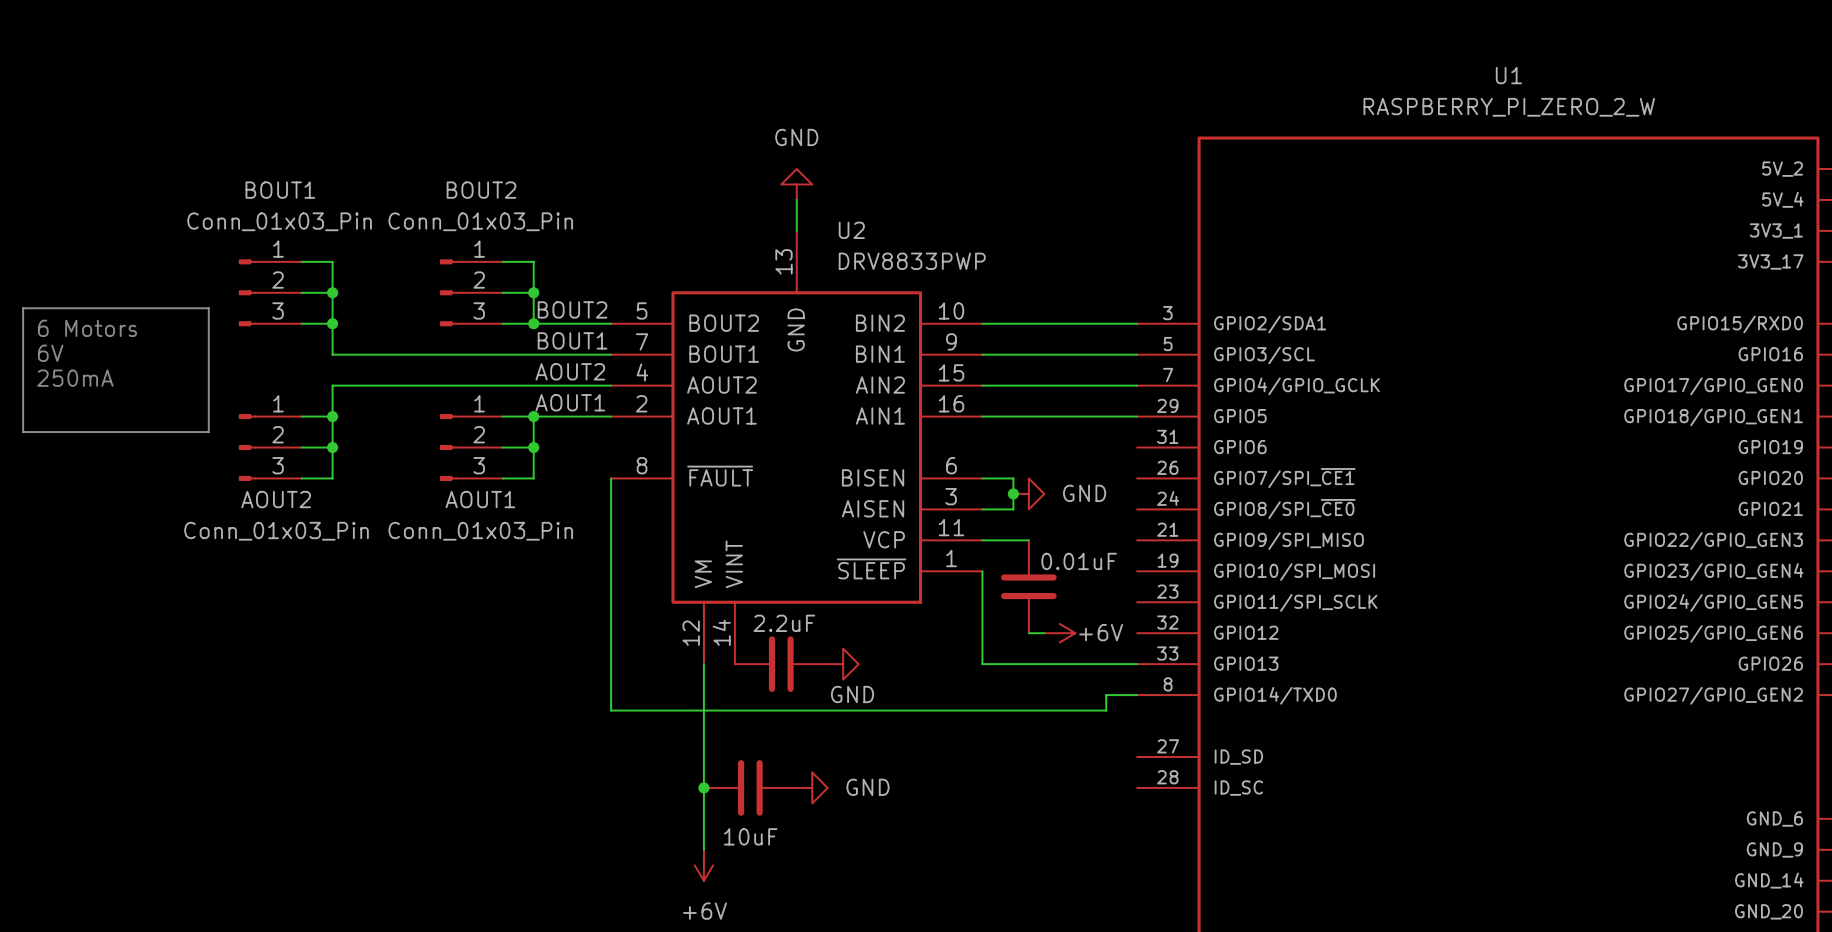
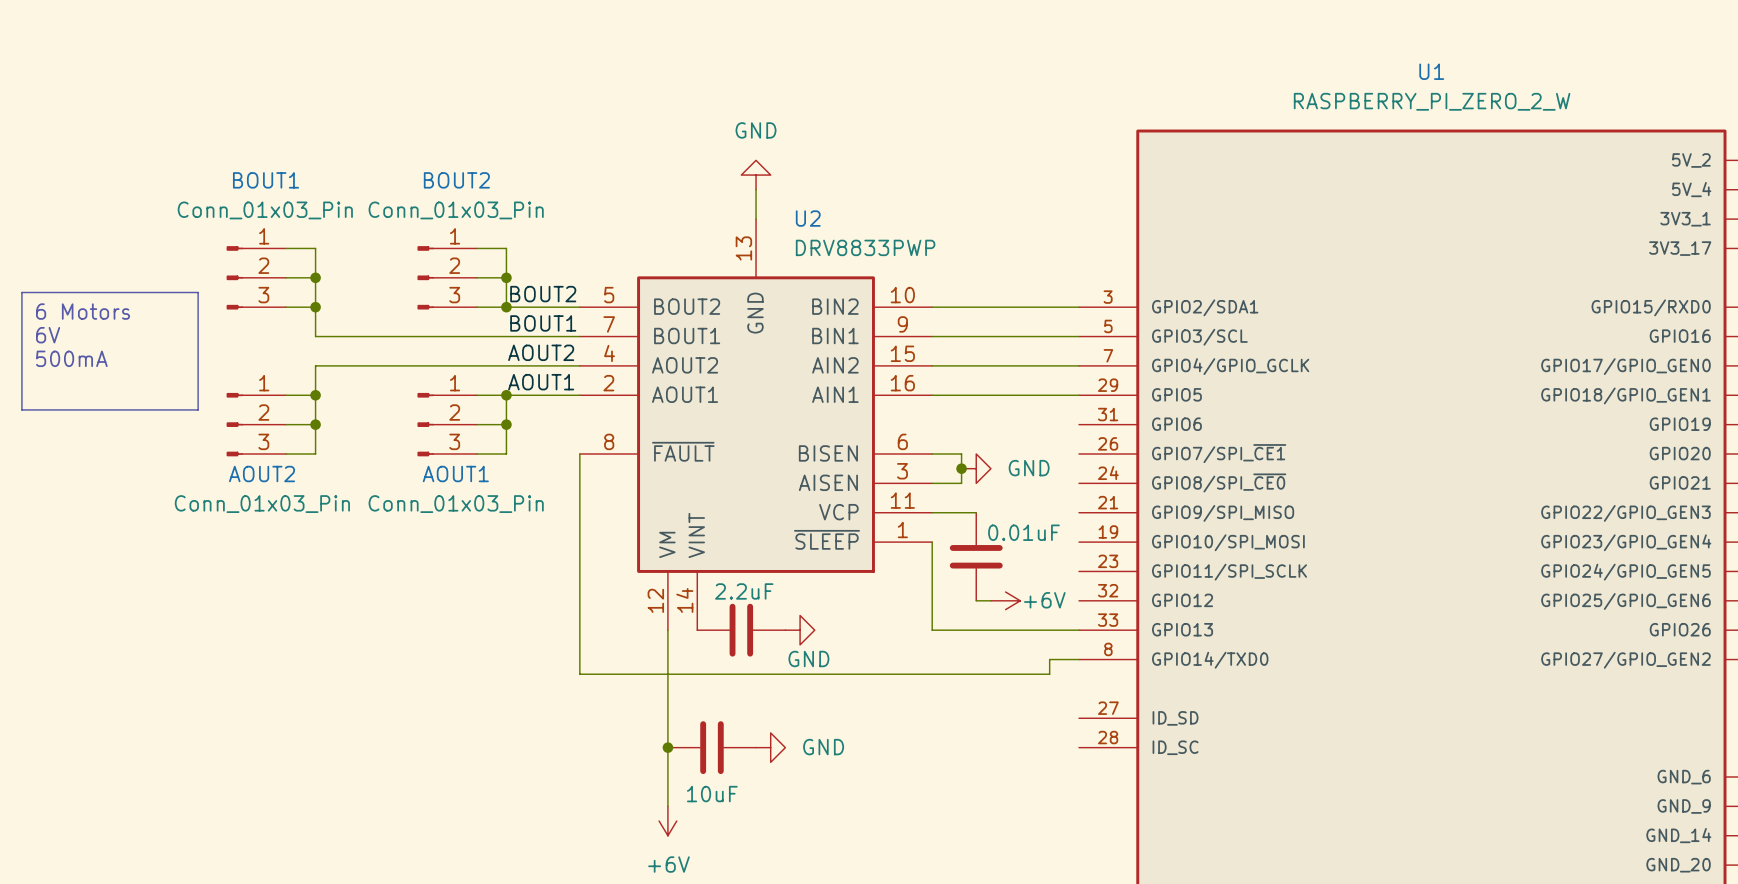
text: 250mA (75, 378) -> 500mA (71, 358)

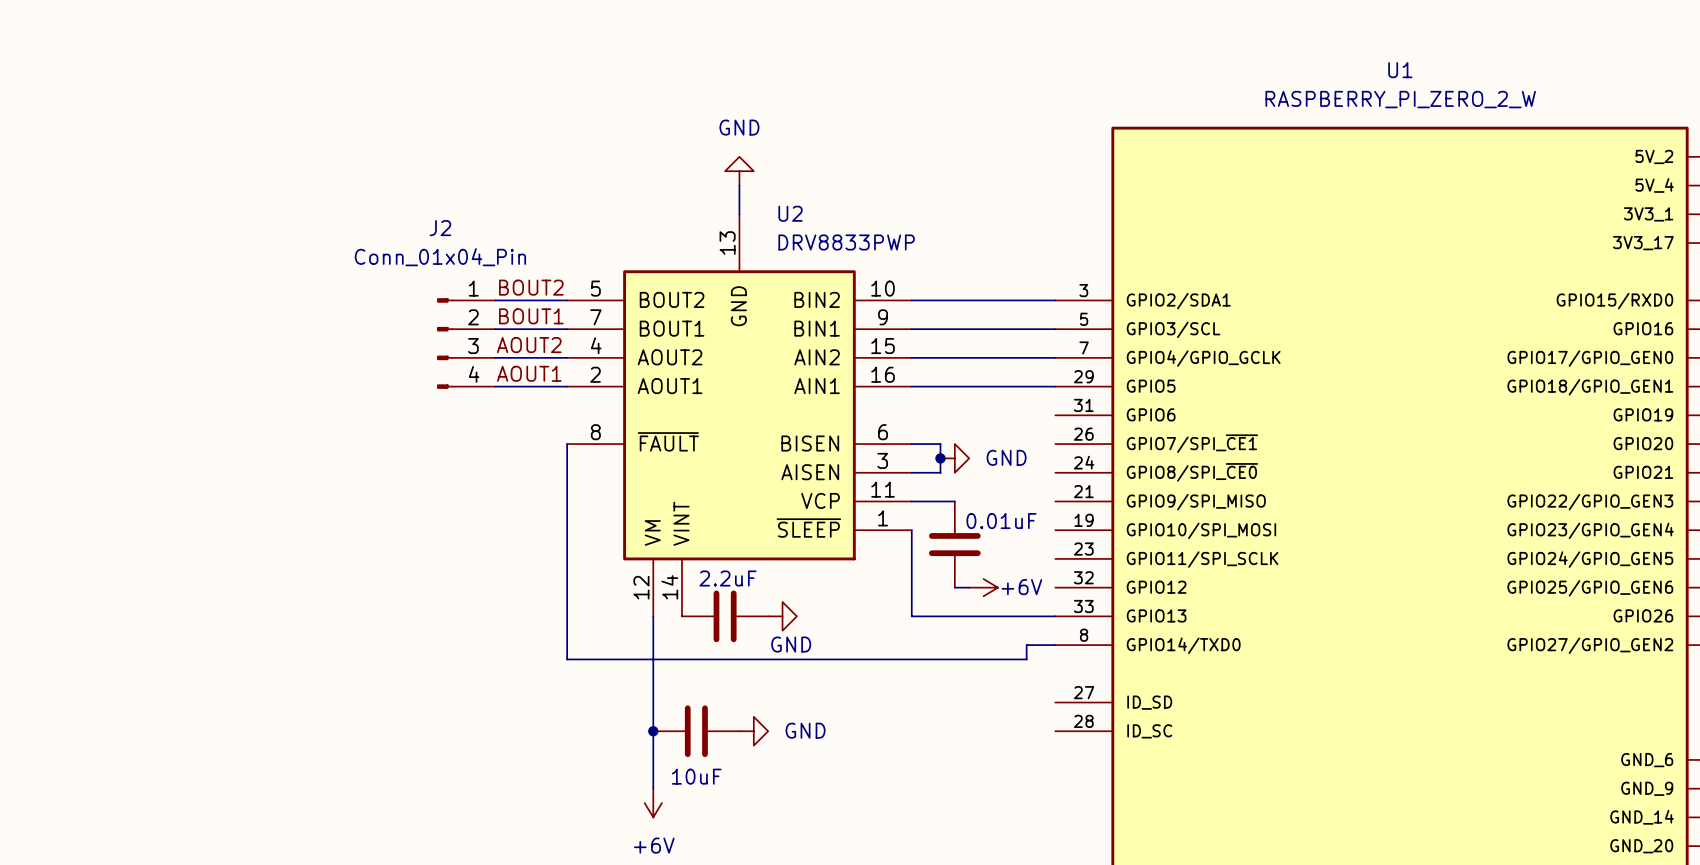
wire: (286, 248) (315, 248) (315, 336) (506, 336) -> none
wire: (477, 248) (506, 248) (506, 307) (477, 307) -> none
BOUT1: Conn_01x03_Pin (256, 277) -> none
wire: (286, 277) (315, 277) -> none
junction: (315, 277) -> none
BOUT2: Conn_01x03_Pin (447, 277) -> none
wire: (477, 277) (506, 277) -> none
junction: (506, 277) -> none
line: (21, 292) (198, 292) (198, 409) (21, 409) (21, 292) -> none
wire: (286, 307) (315, 307) -> none
junction: (315, 307) -> none
junction: (506, 307) -> none
text: 6 Motors (83, 311) -> none
text: 6V (48, 335) -> none
J2: none -> Conn_01x04_Pin (466, 343)
text: 500mA (71, 358) -> none
wire: (506, 365) (315, 365) (315, 454) (286, 454) -> none
wire: (286, 395) (315, 395) -> none
junction: (315, 395) -> none
wire: (477, 395) (506, 395) (506, 454) (477, 454) -> none
junction: (506, 395) -> none
AOUT2: Conn_01x03_Pin (256, 424) -> none
wire: (286, 424) (315, 424) -> none
junction: (315, 424) -> none
AOUT1: Conn_01x03_Pin (447, 424) -> none
wire: (477, 424) (506, 424) -> none
junction: (506, 424) -> none

